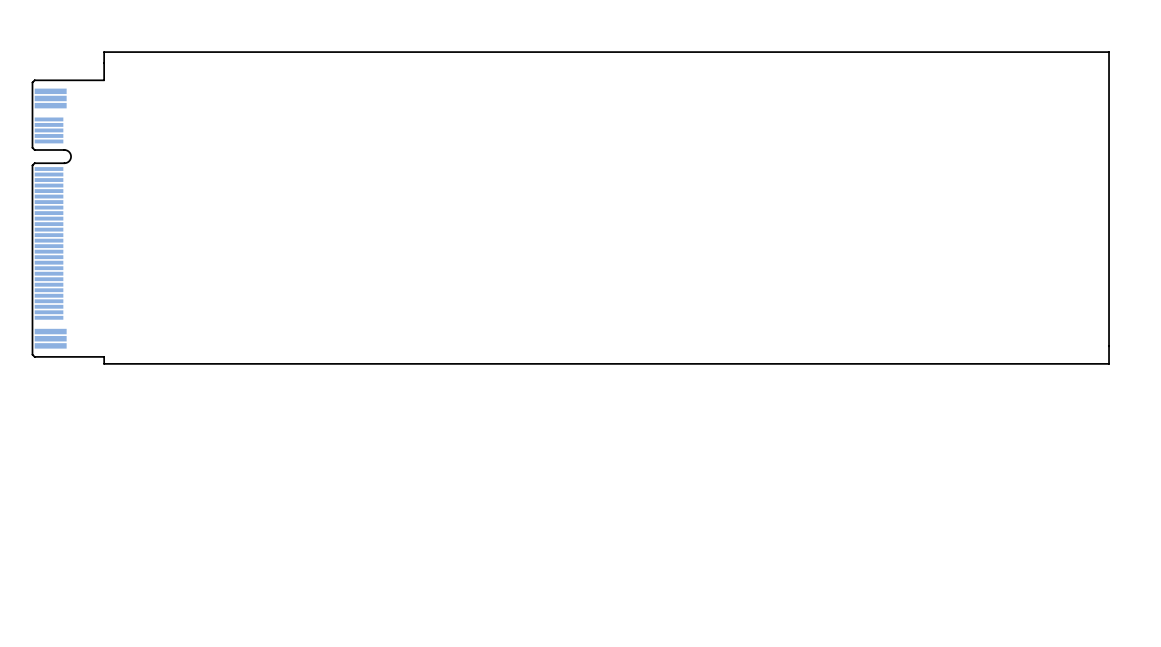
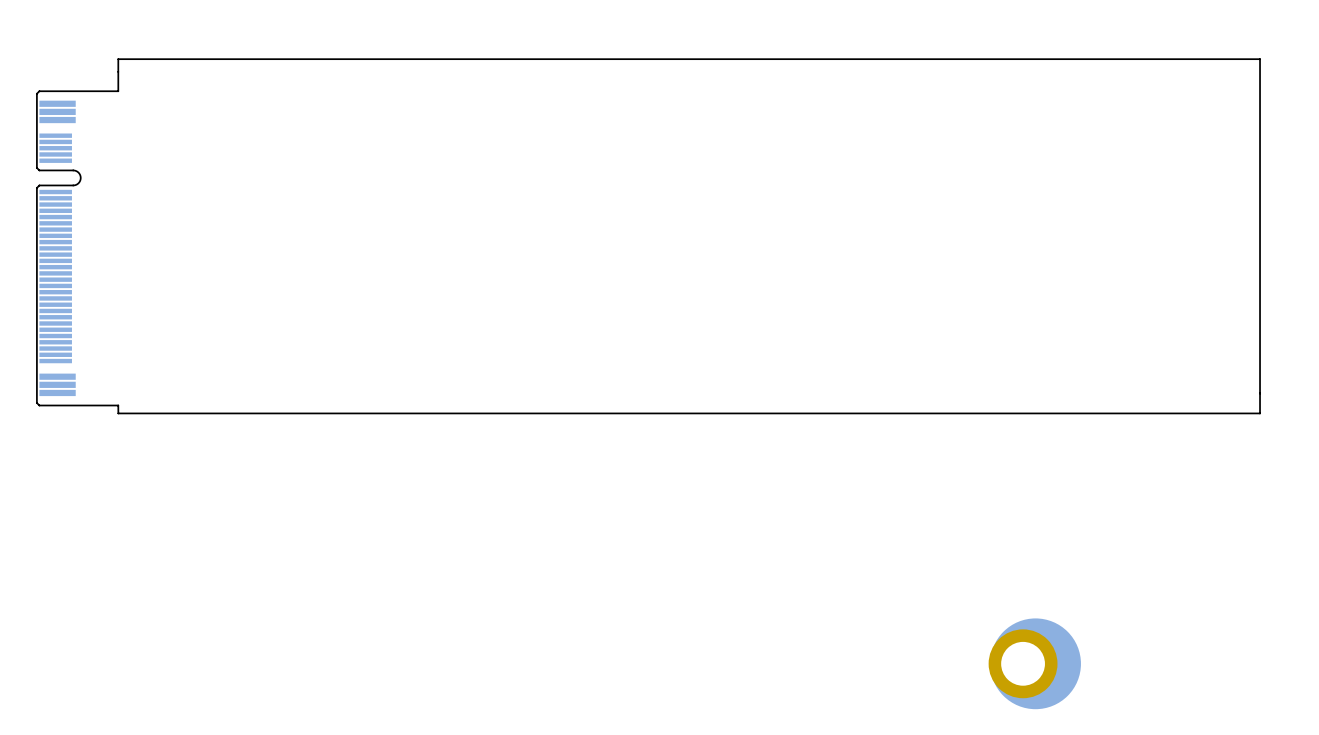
part: none -> (1034, 663)

